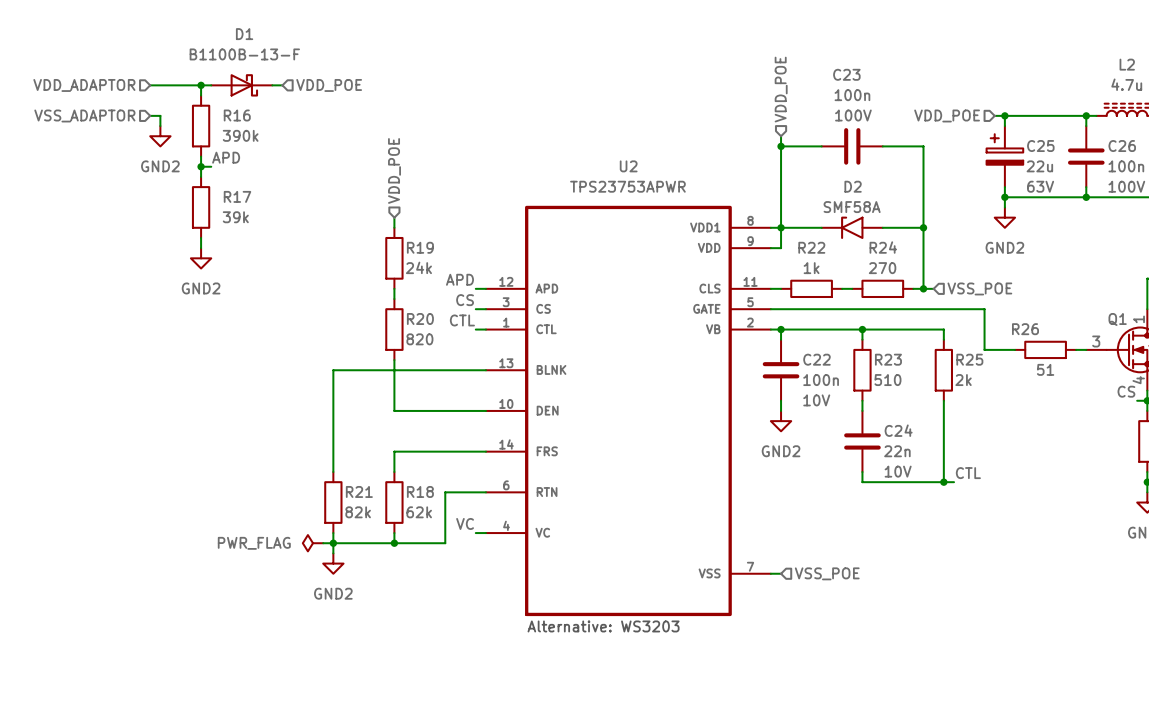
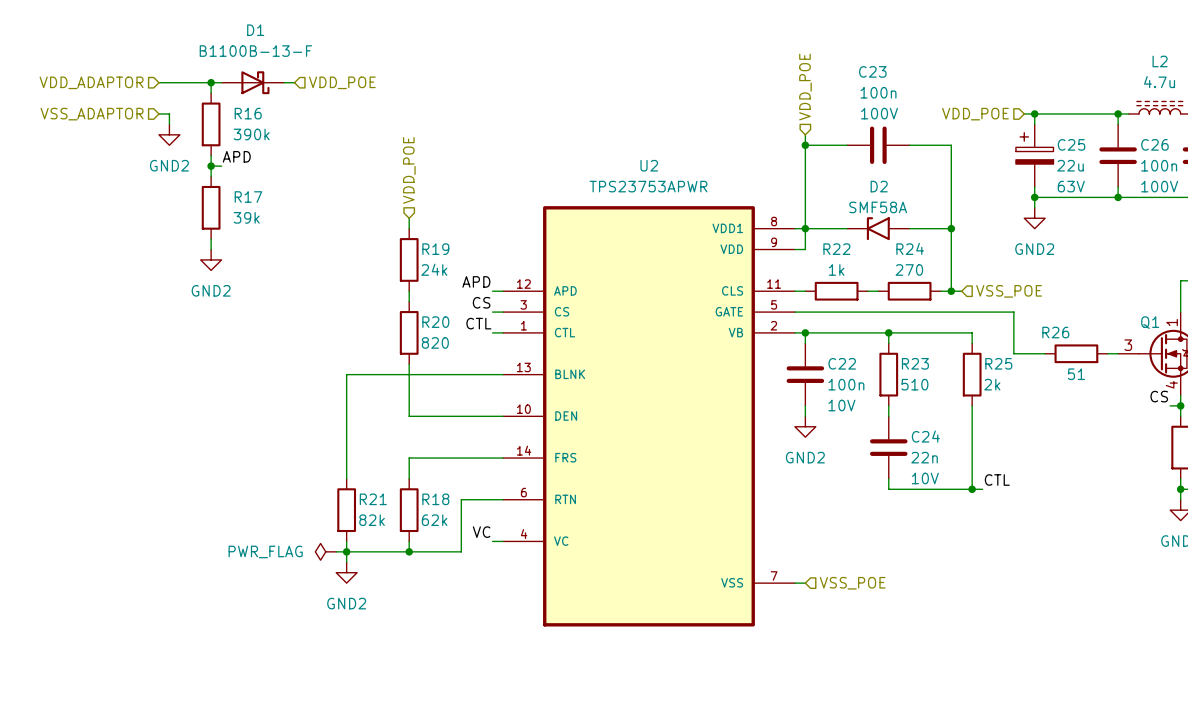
text: Alternative: WS3203 (603, 626) -> none

